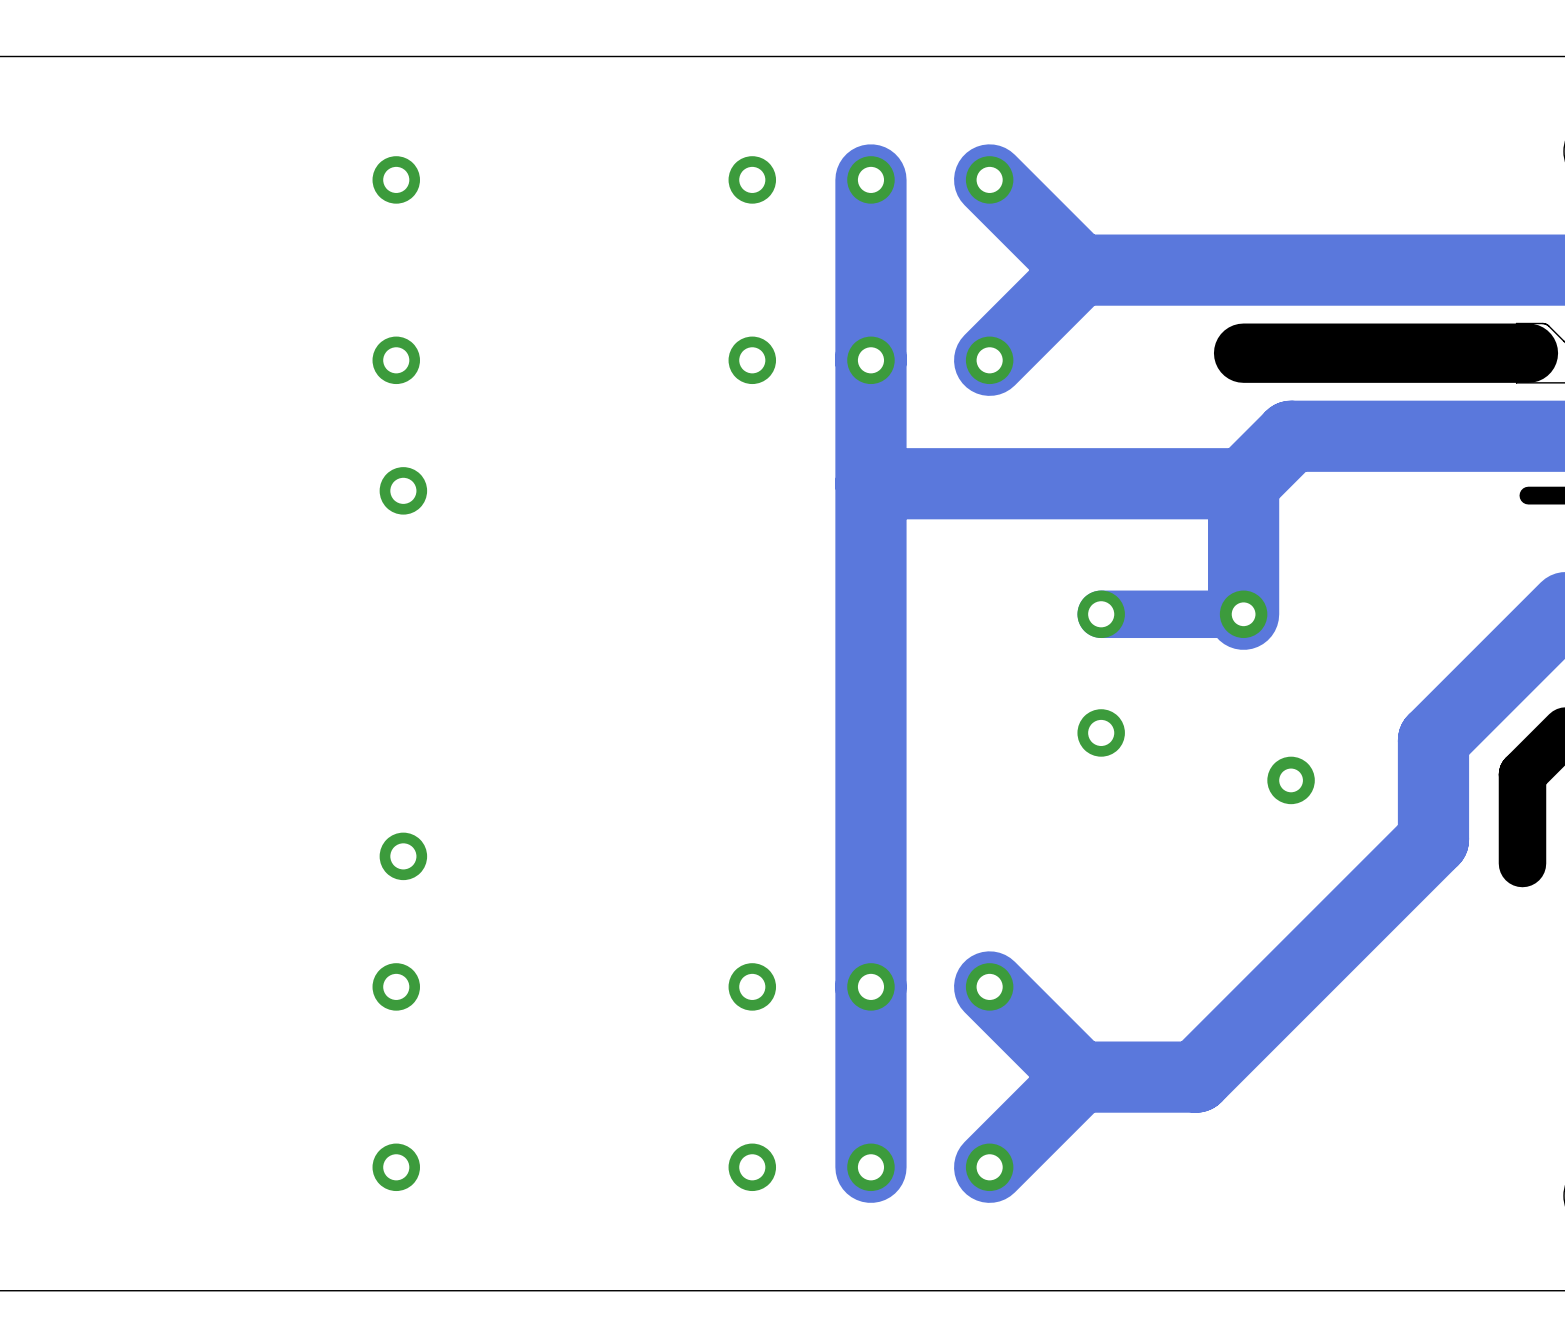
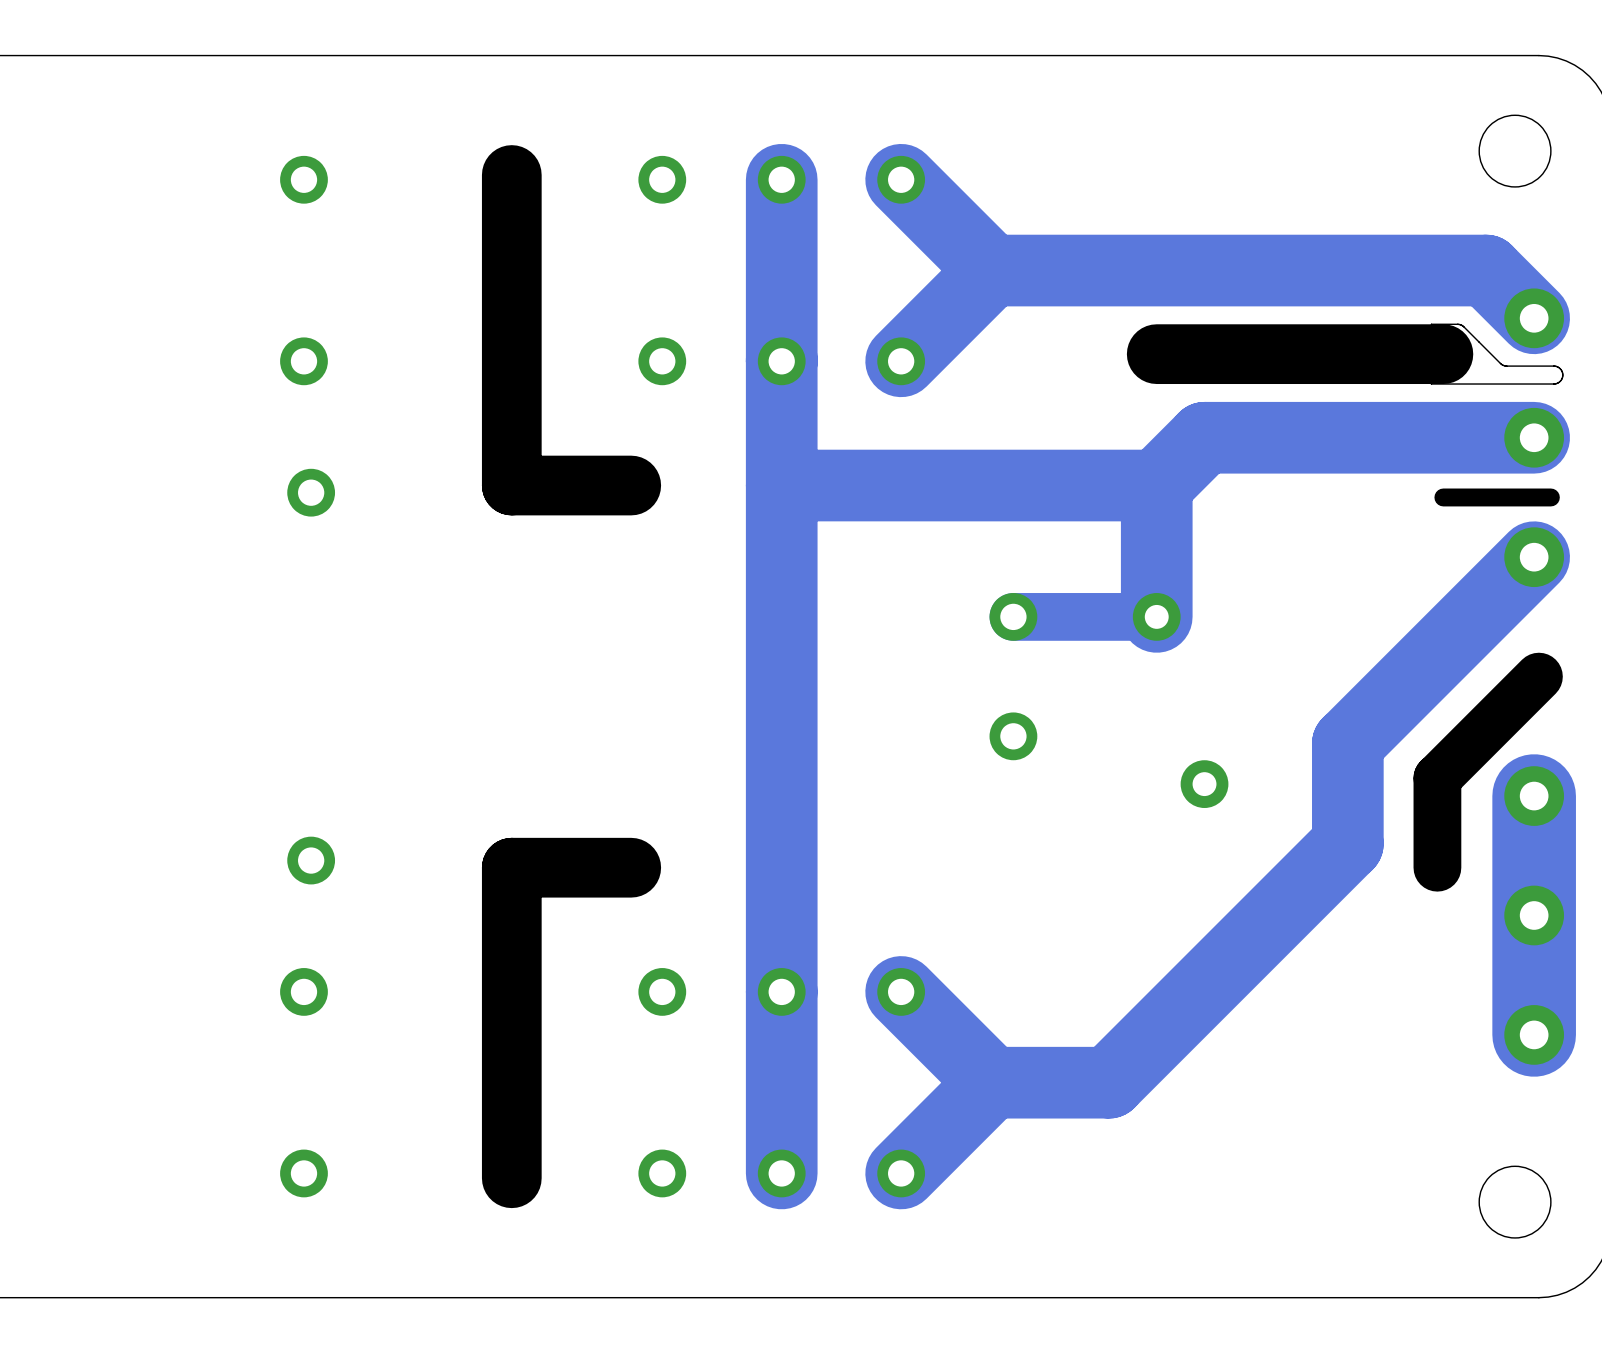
board edge: none -> (511, 175) (511, 485) (631, 485)
board edge: none -> (631, 867) (511, 867) (511, 1178)

